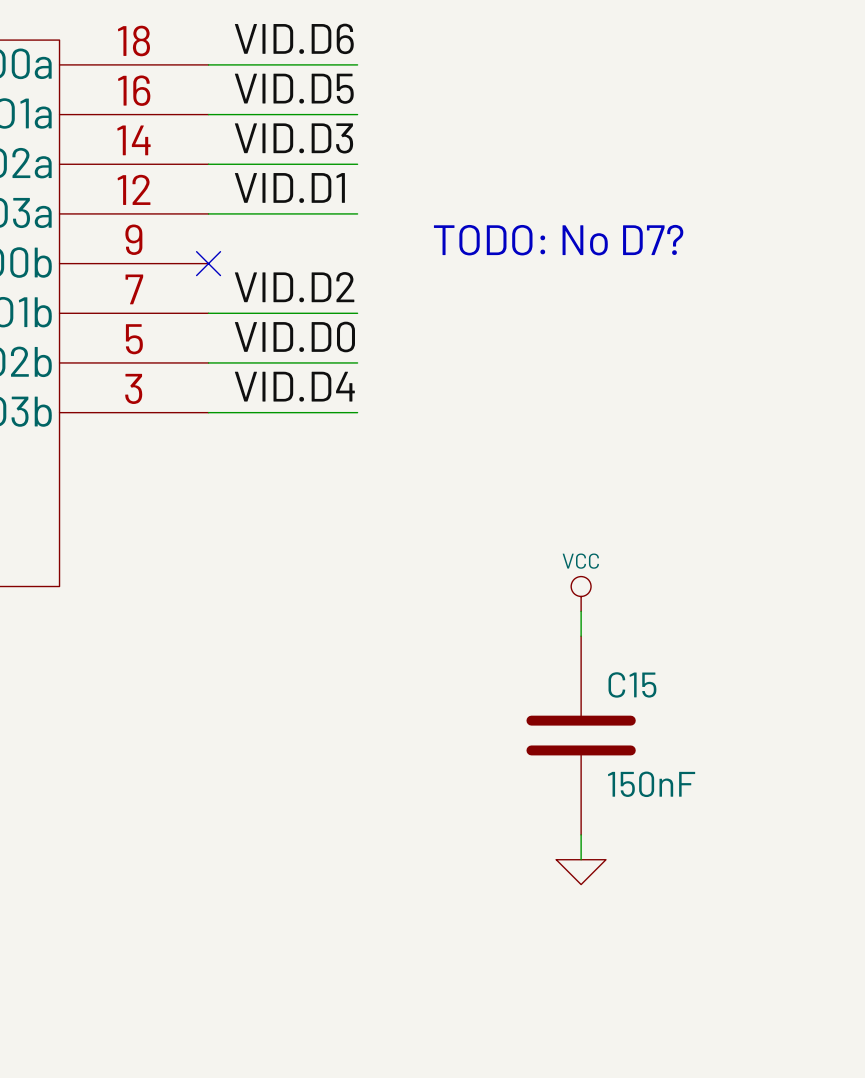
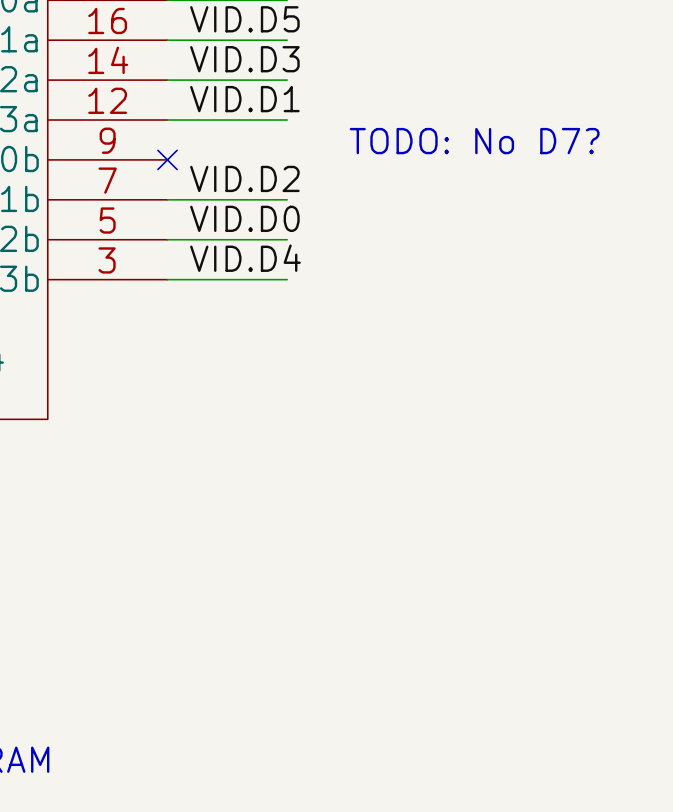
power symbol: VCC (581, 593) -> none
wire: (581, 611) (581, 636) -> none
C15: 150nF (581, 735) -> none
wire: (581, 834) (581, 859) -> none
power symbol: (581, 872) -> none

